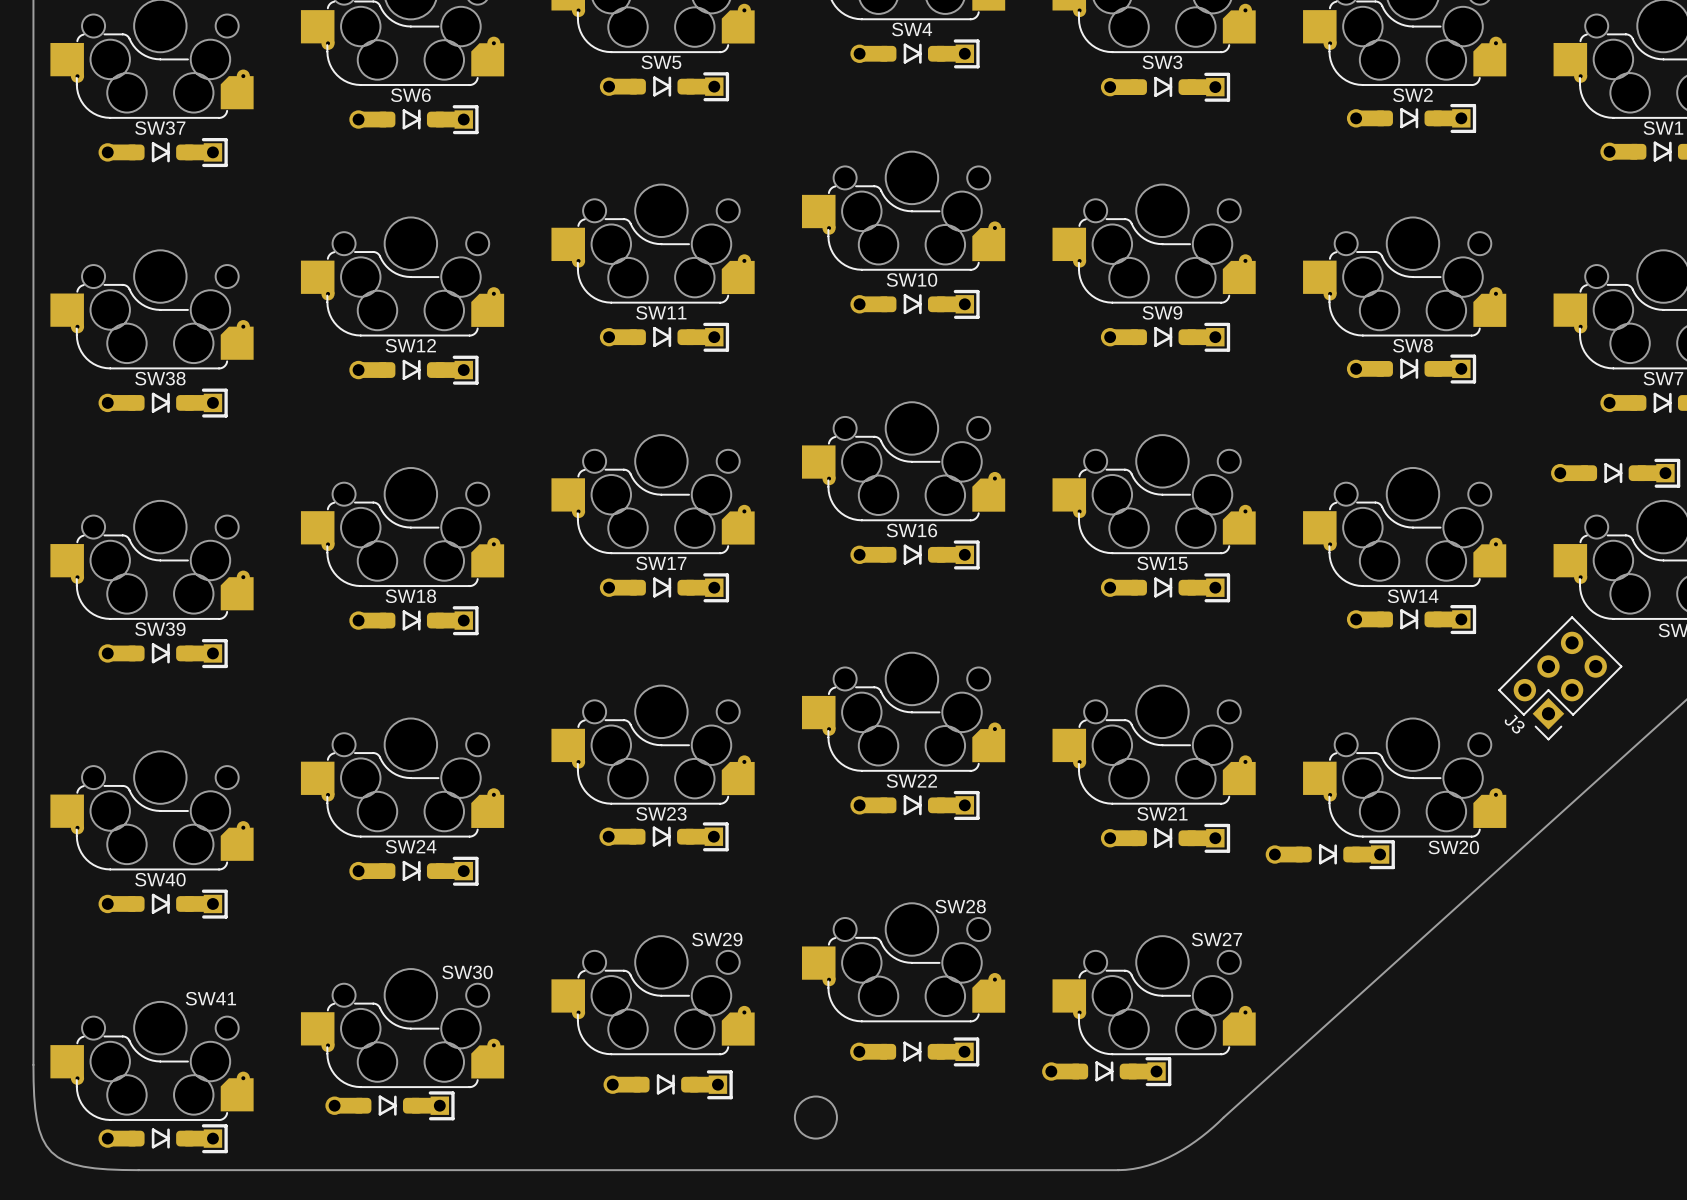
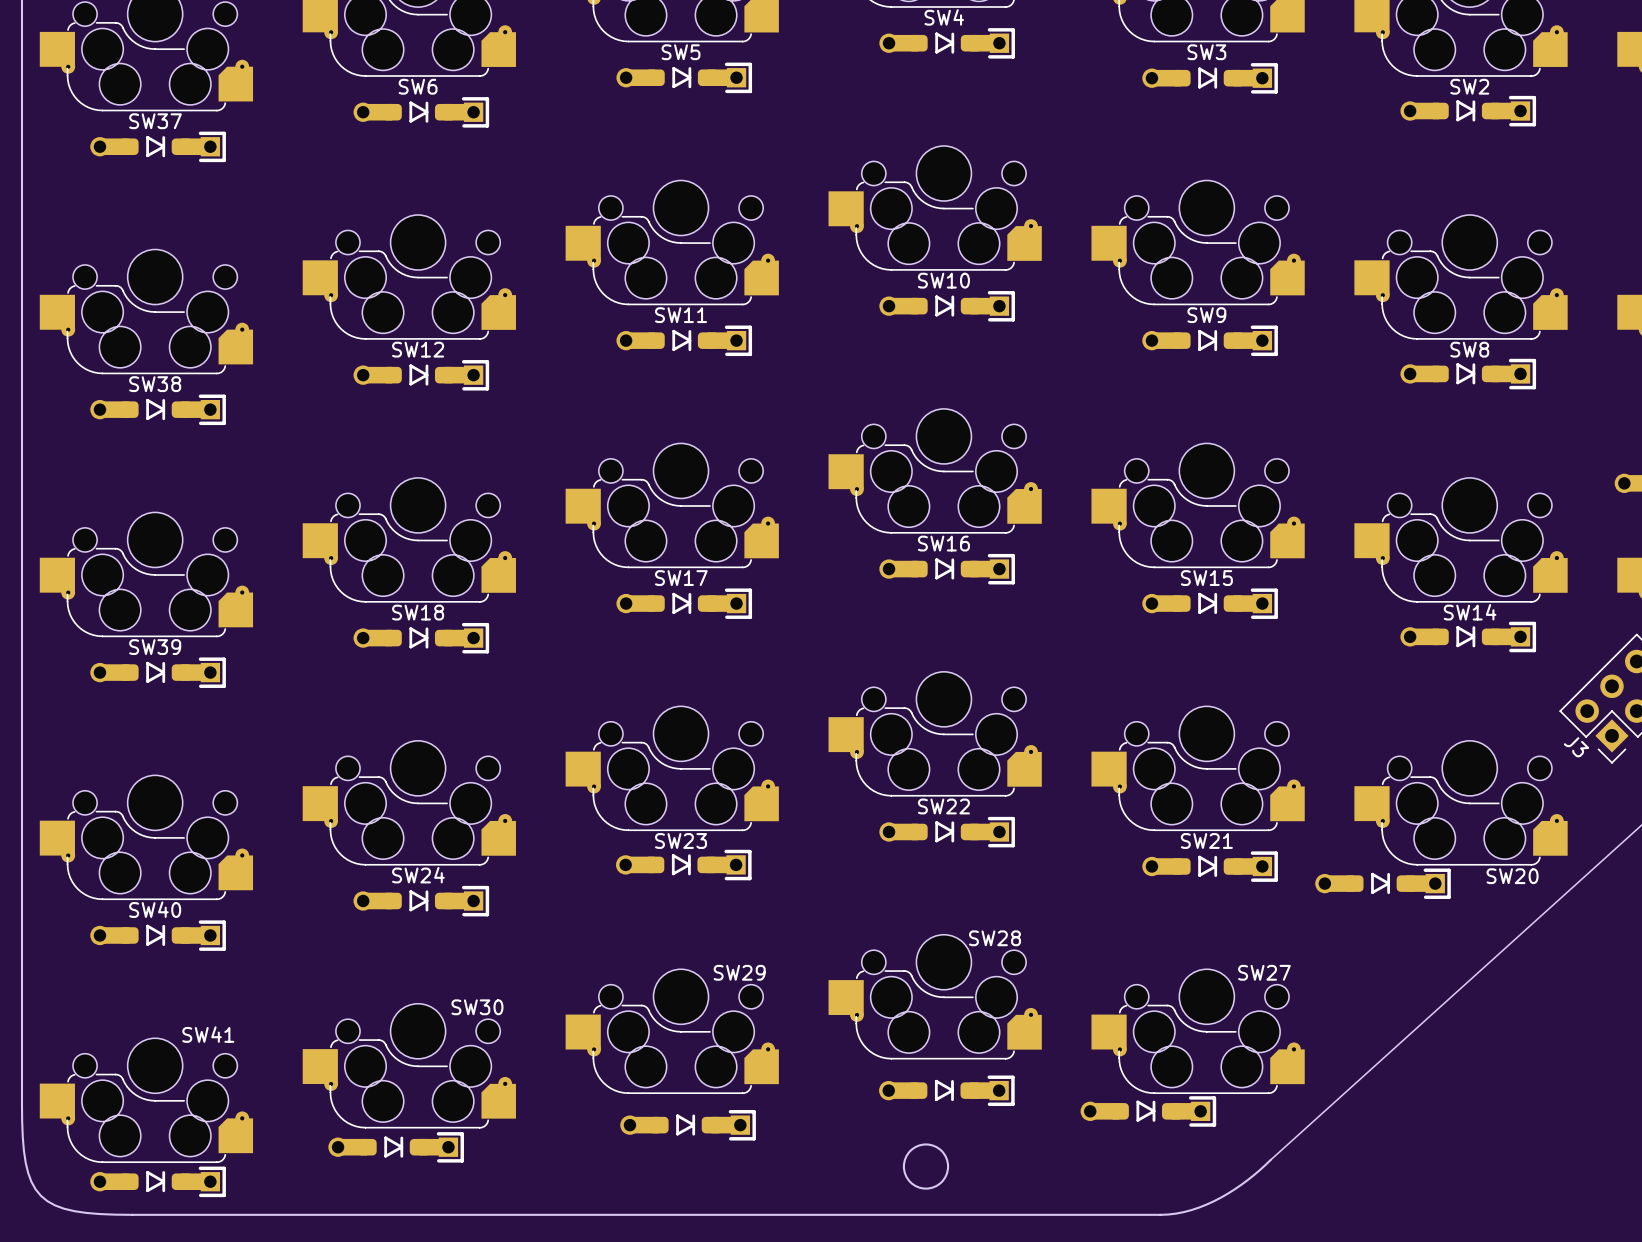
round board edge position: (815, 1117) -> (925, 1166)

